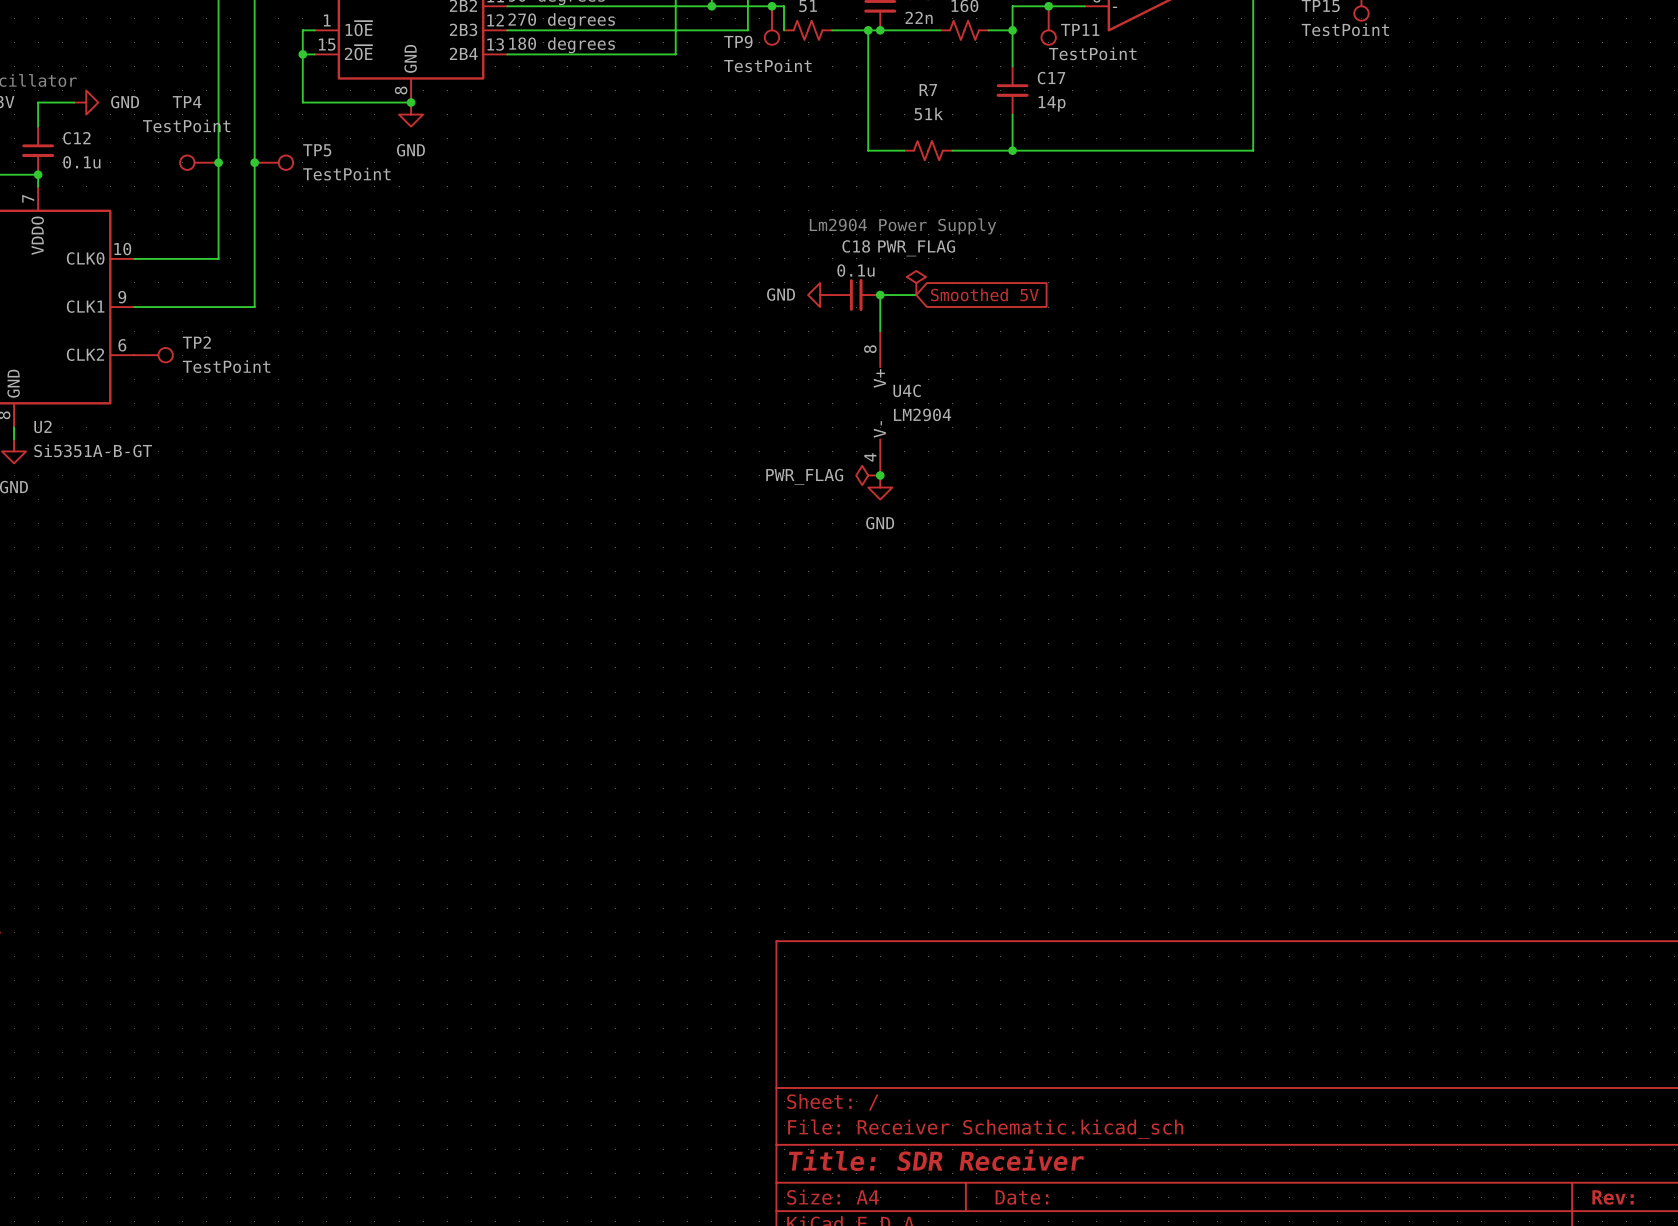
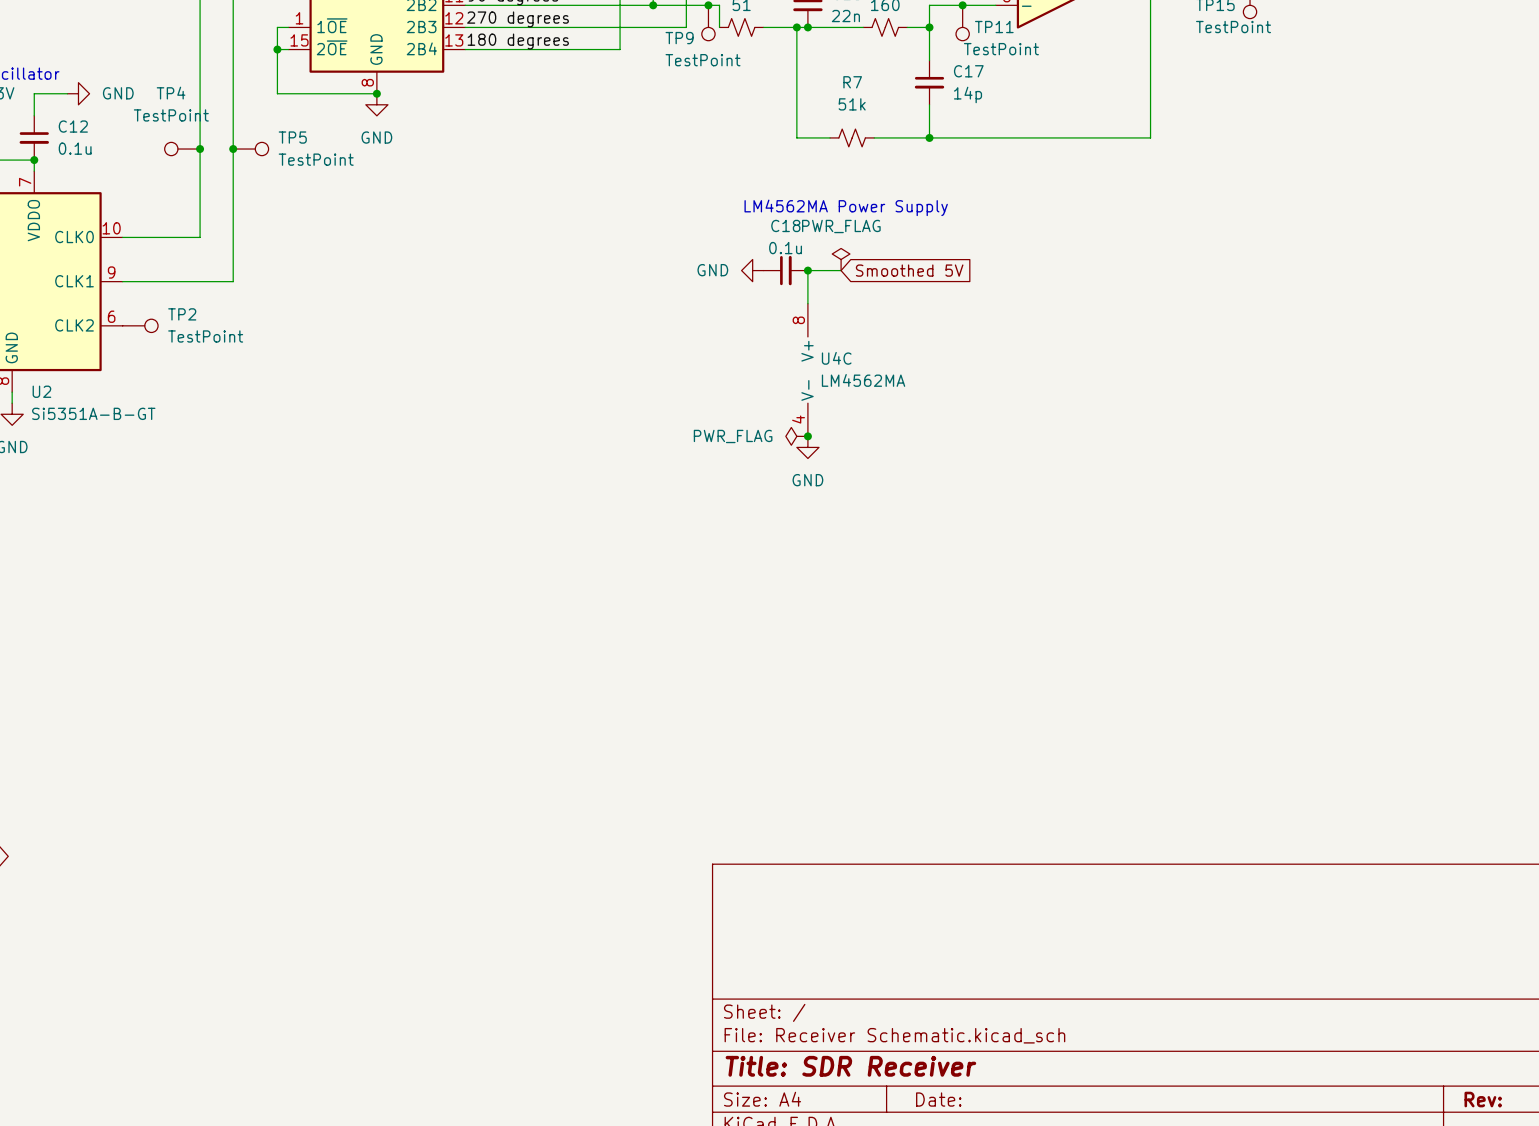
text: Lm2904 Power Supply (902, 226) -> LM4562MA Power Supply (846, 207)
U4C value: LM2904 (922, 414) -> LM4562MA (863, 380)

